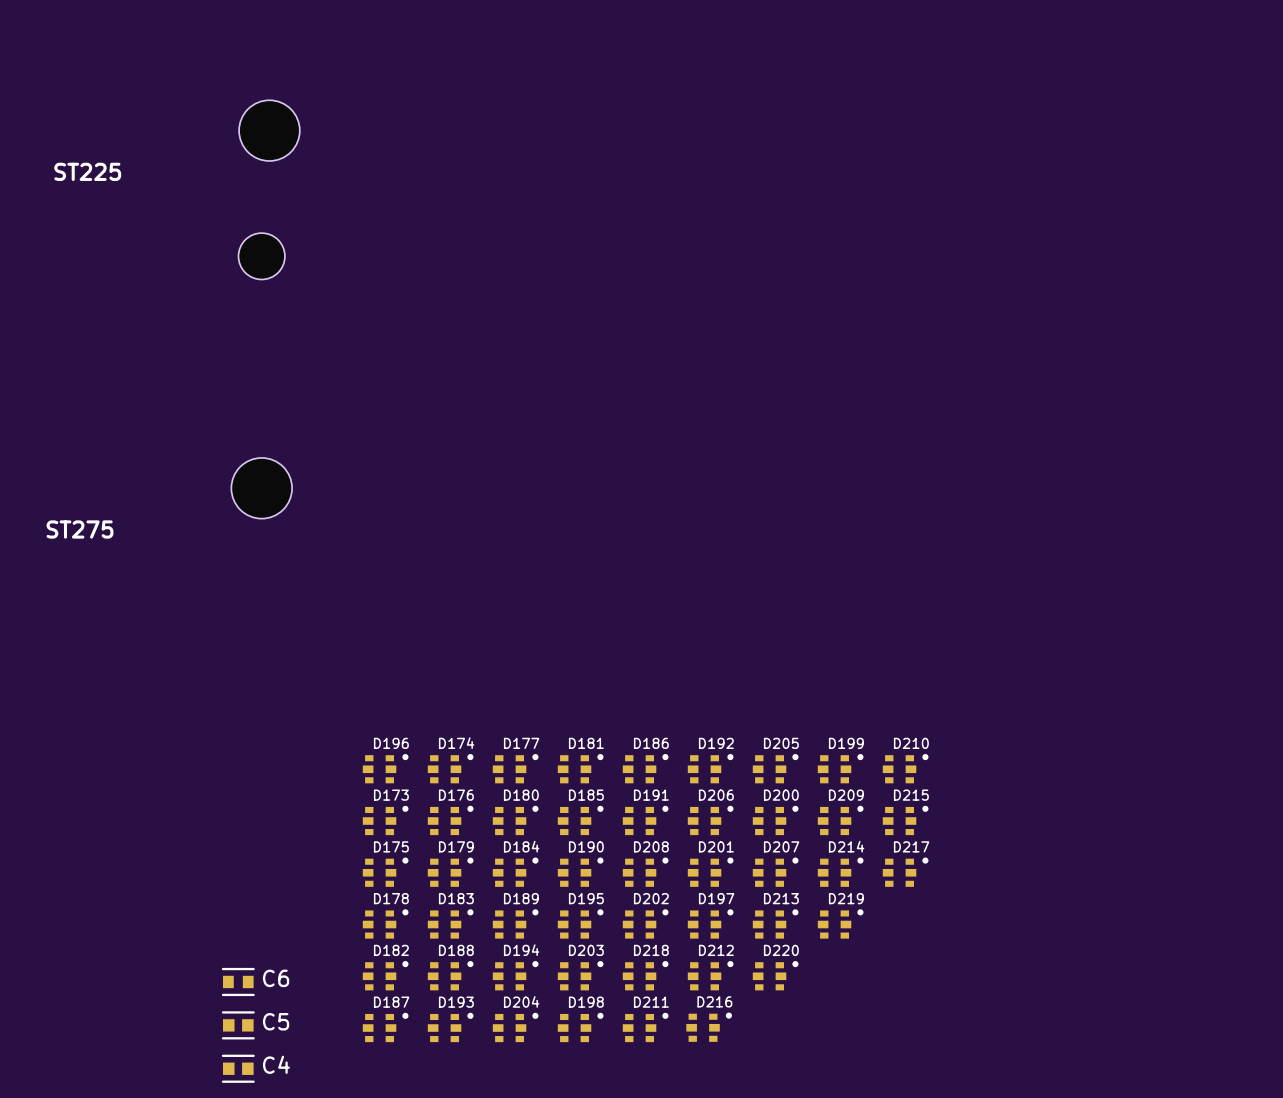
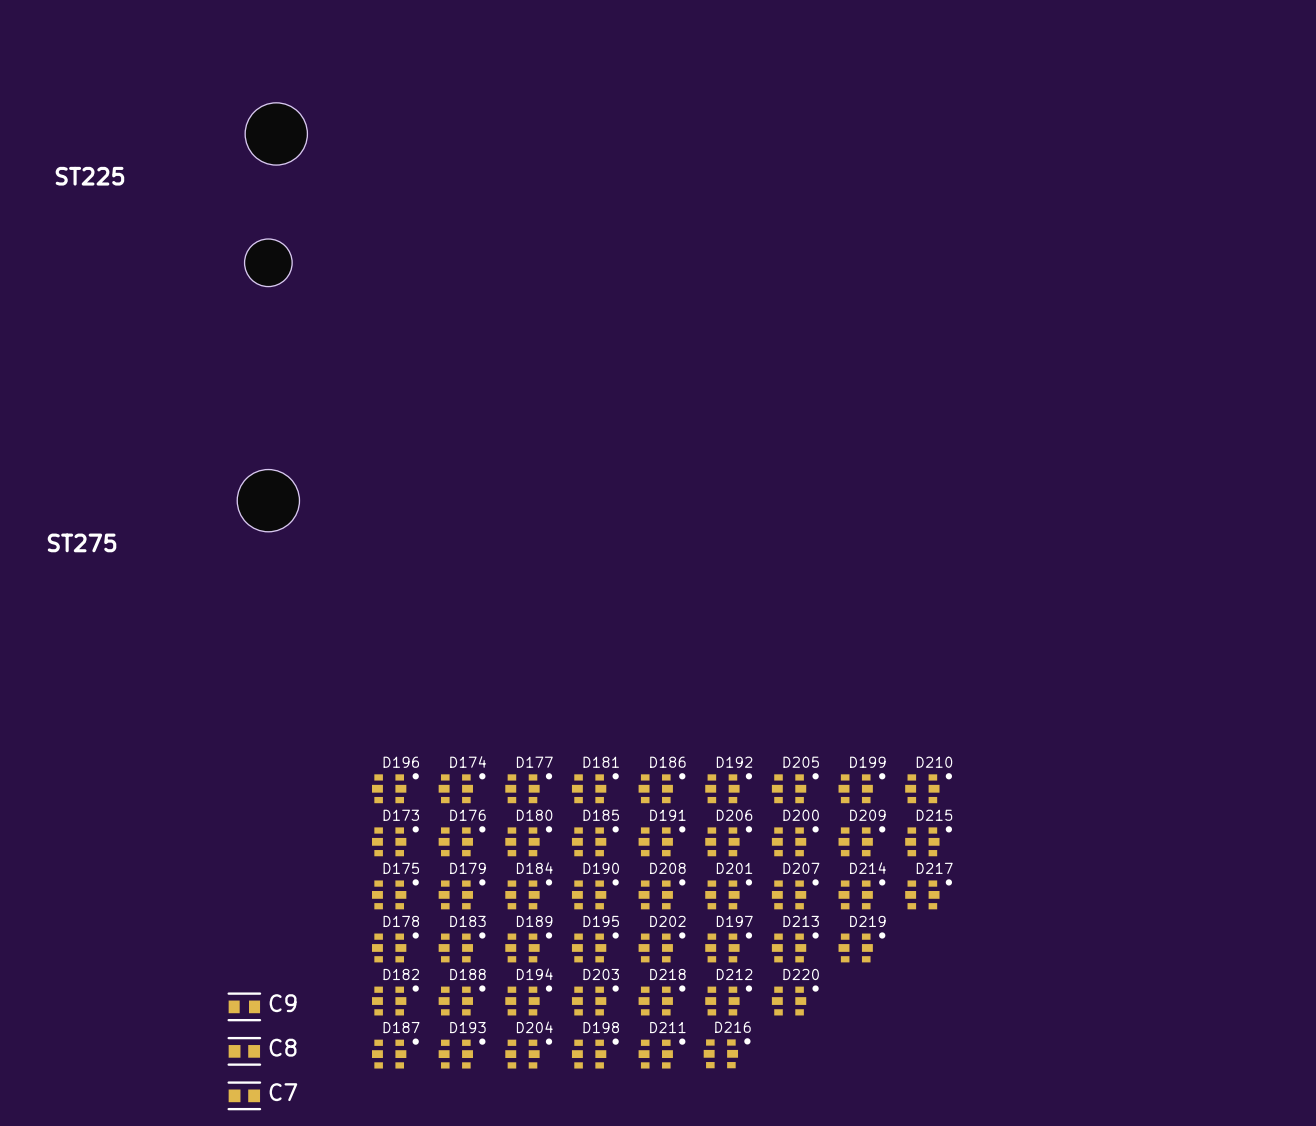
C6 name: C6 (276, 978) -> C9 (283, 1003)
C5 name: C5 (276, 1021) -> C8 (283, 1047)
C4 name: C4 (276, 1064) -> C7 (283, 1092)

